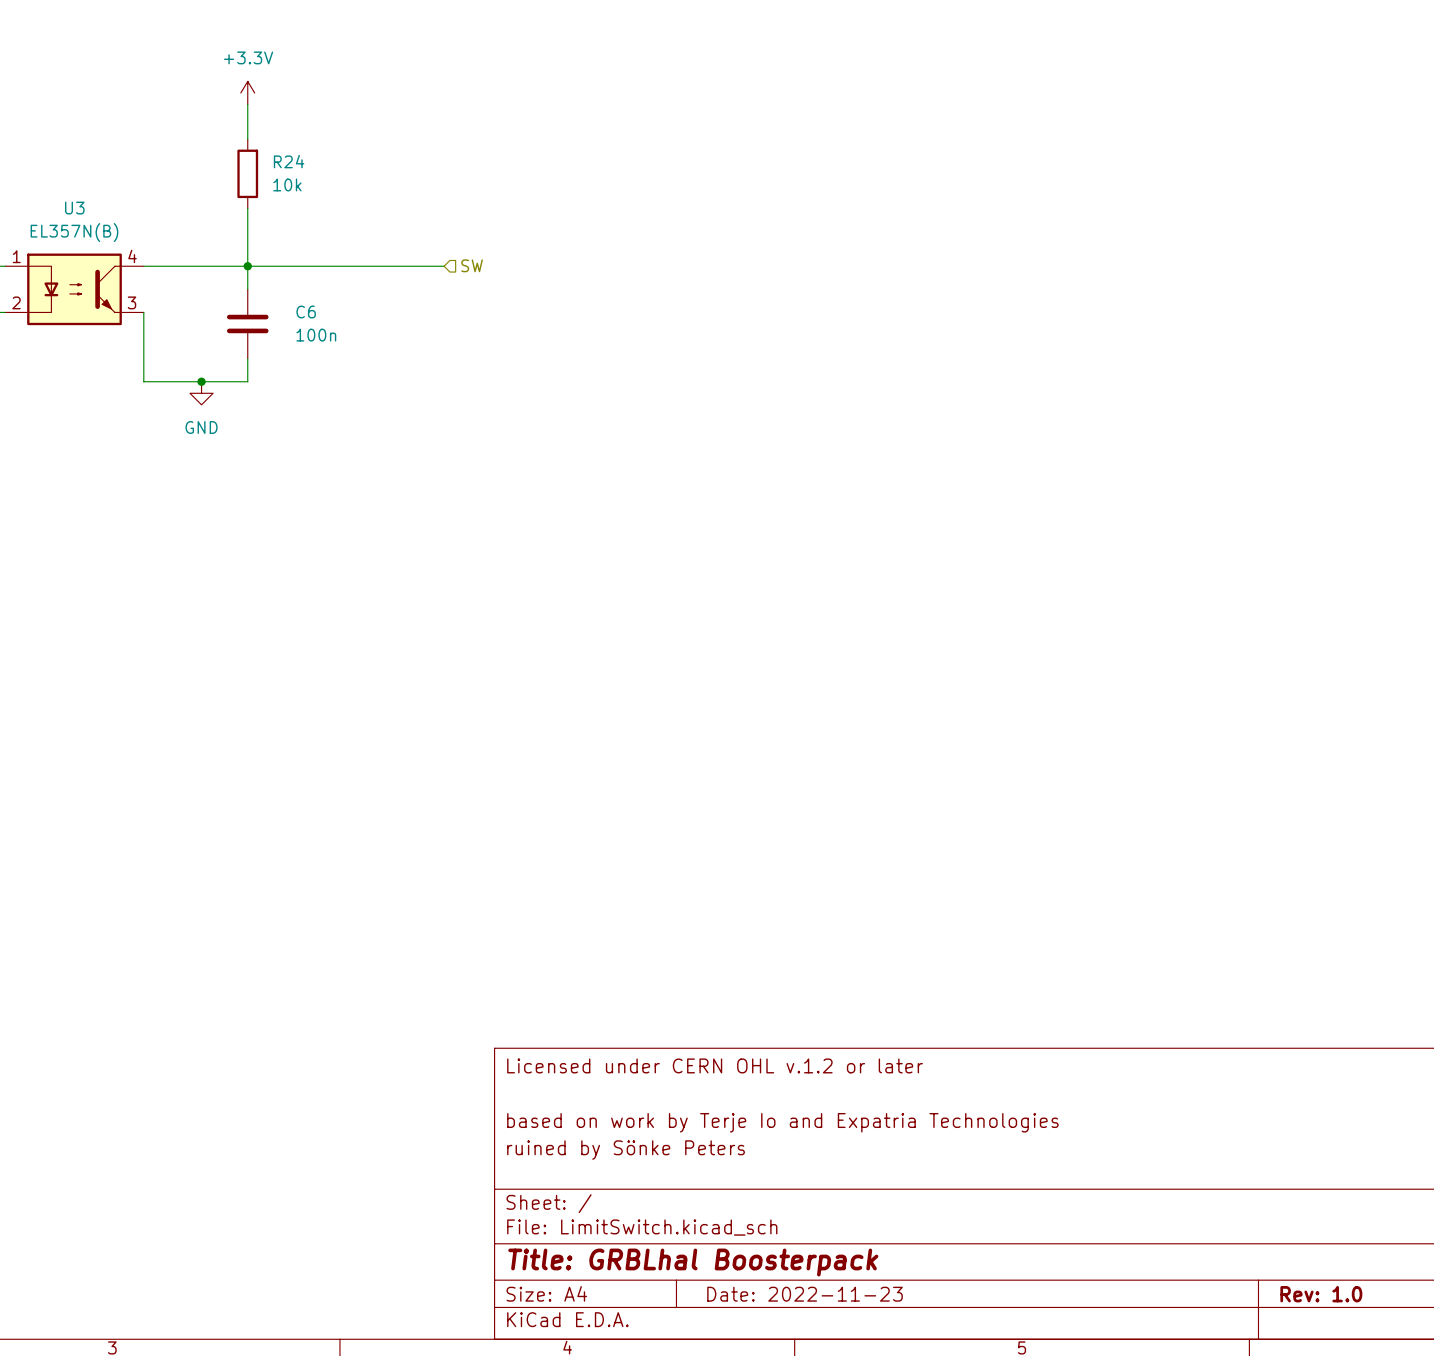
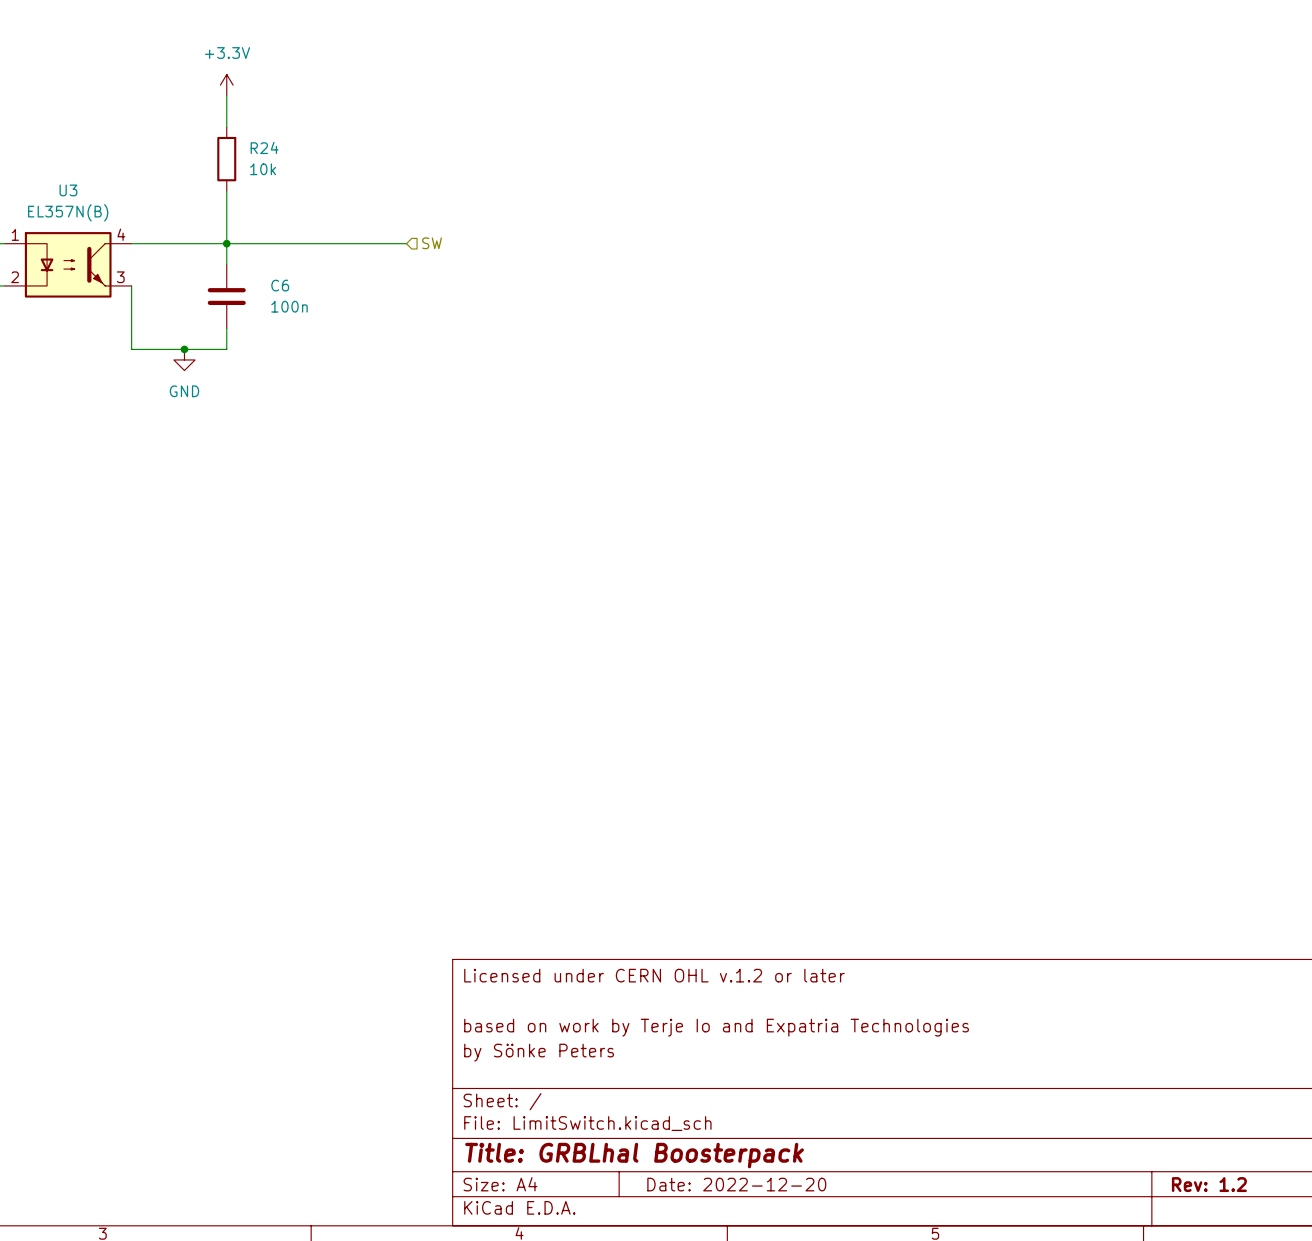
title block: ruined by Sönke Peters (626, 1150) -> by Sönke Peters (539, 1052)
title block: Date: 2022-11-23 (805, 1294) -> Date: 2022-12-20 (736, 1184)
title block: Rev: 1.0 (1321, 1294) -> Rev: 1.2 (1209, 1184)

